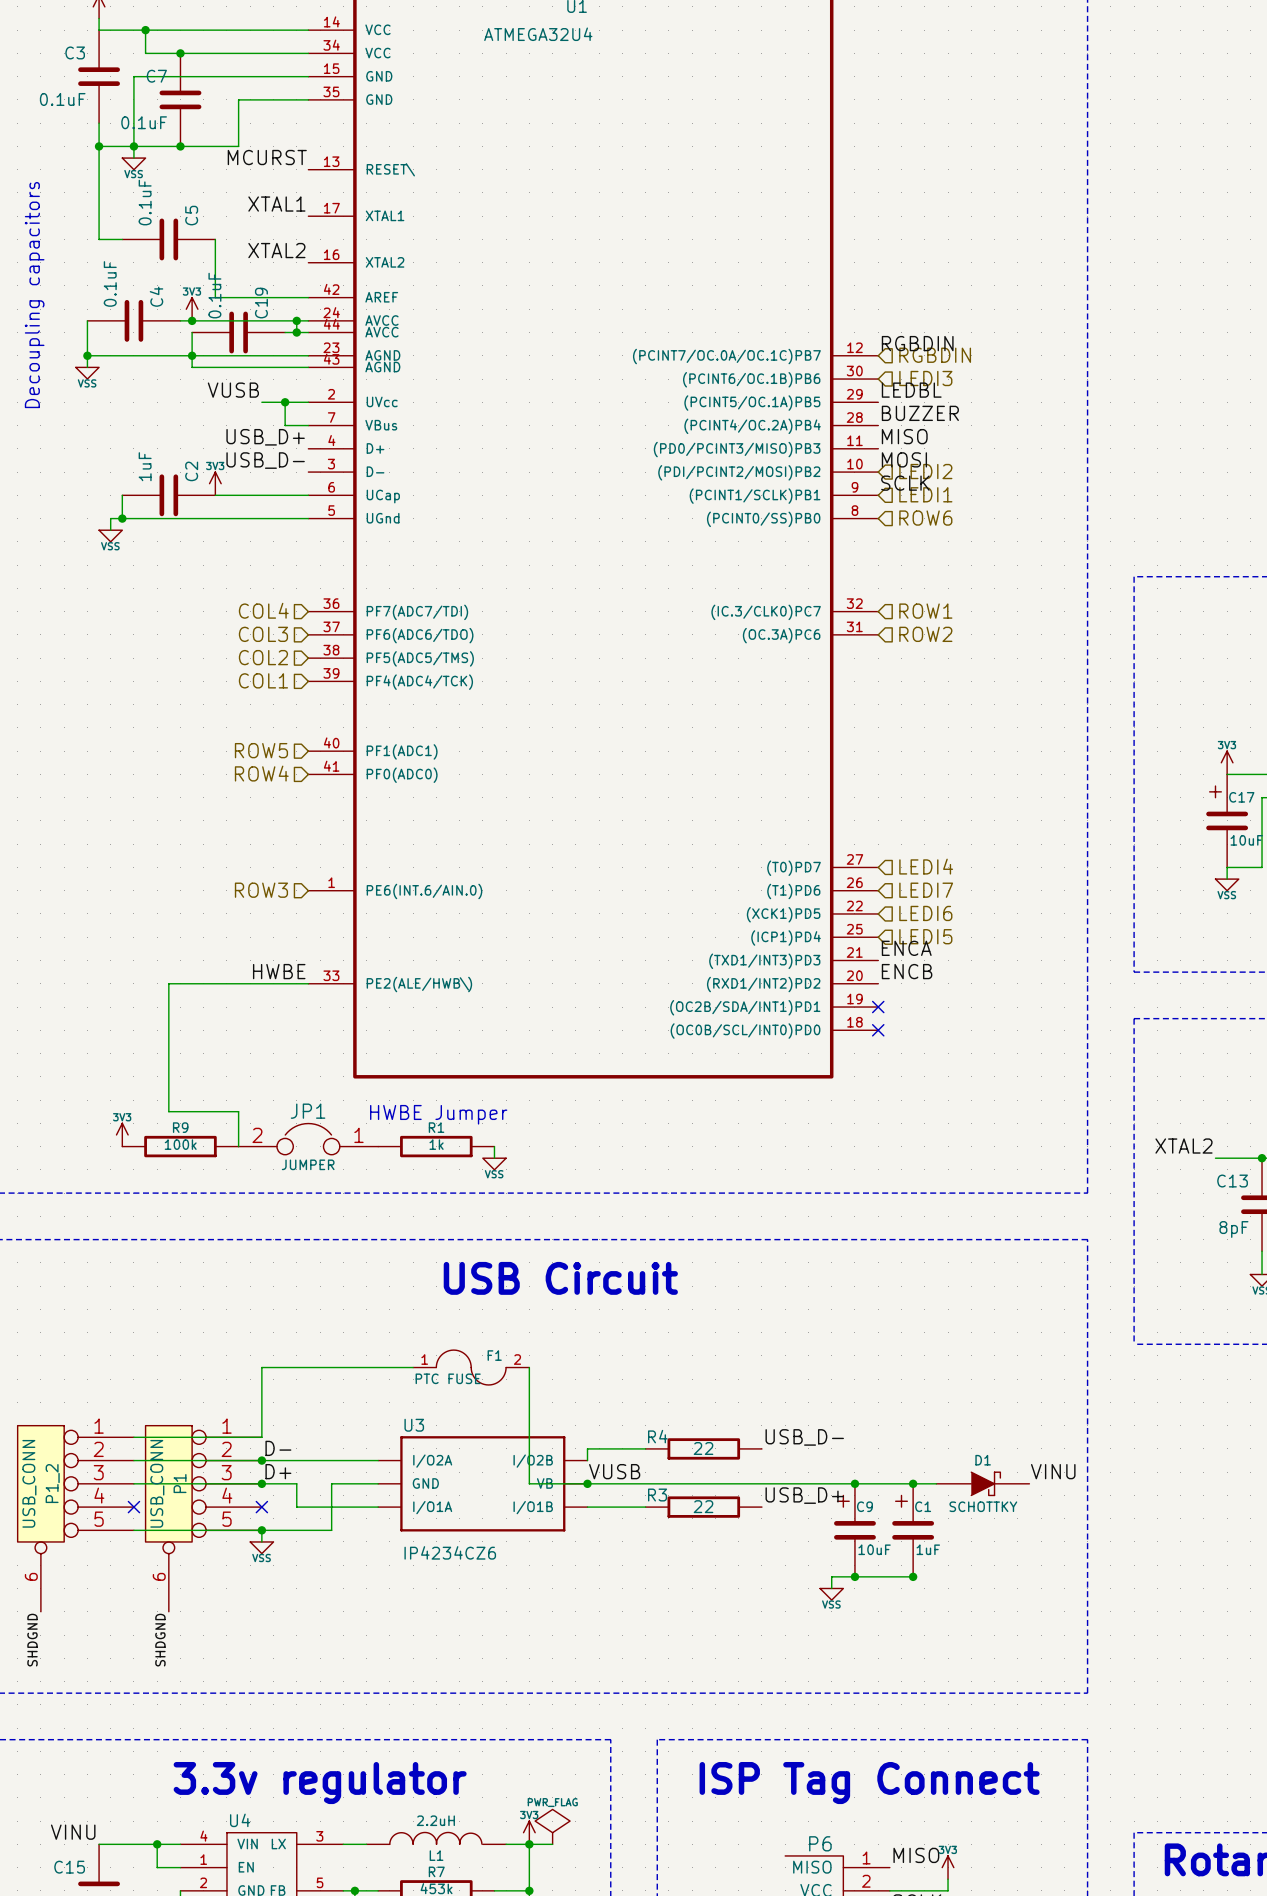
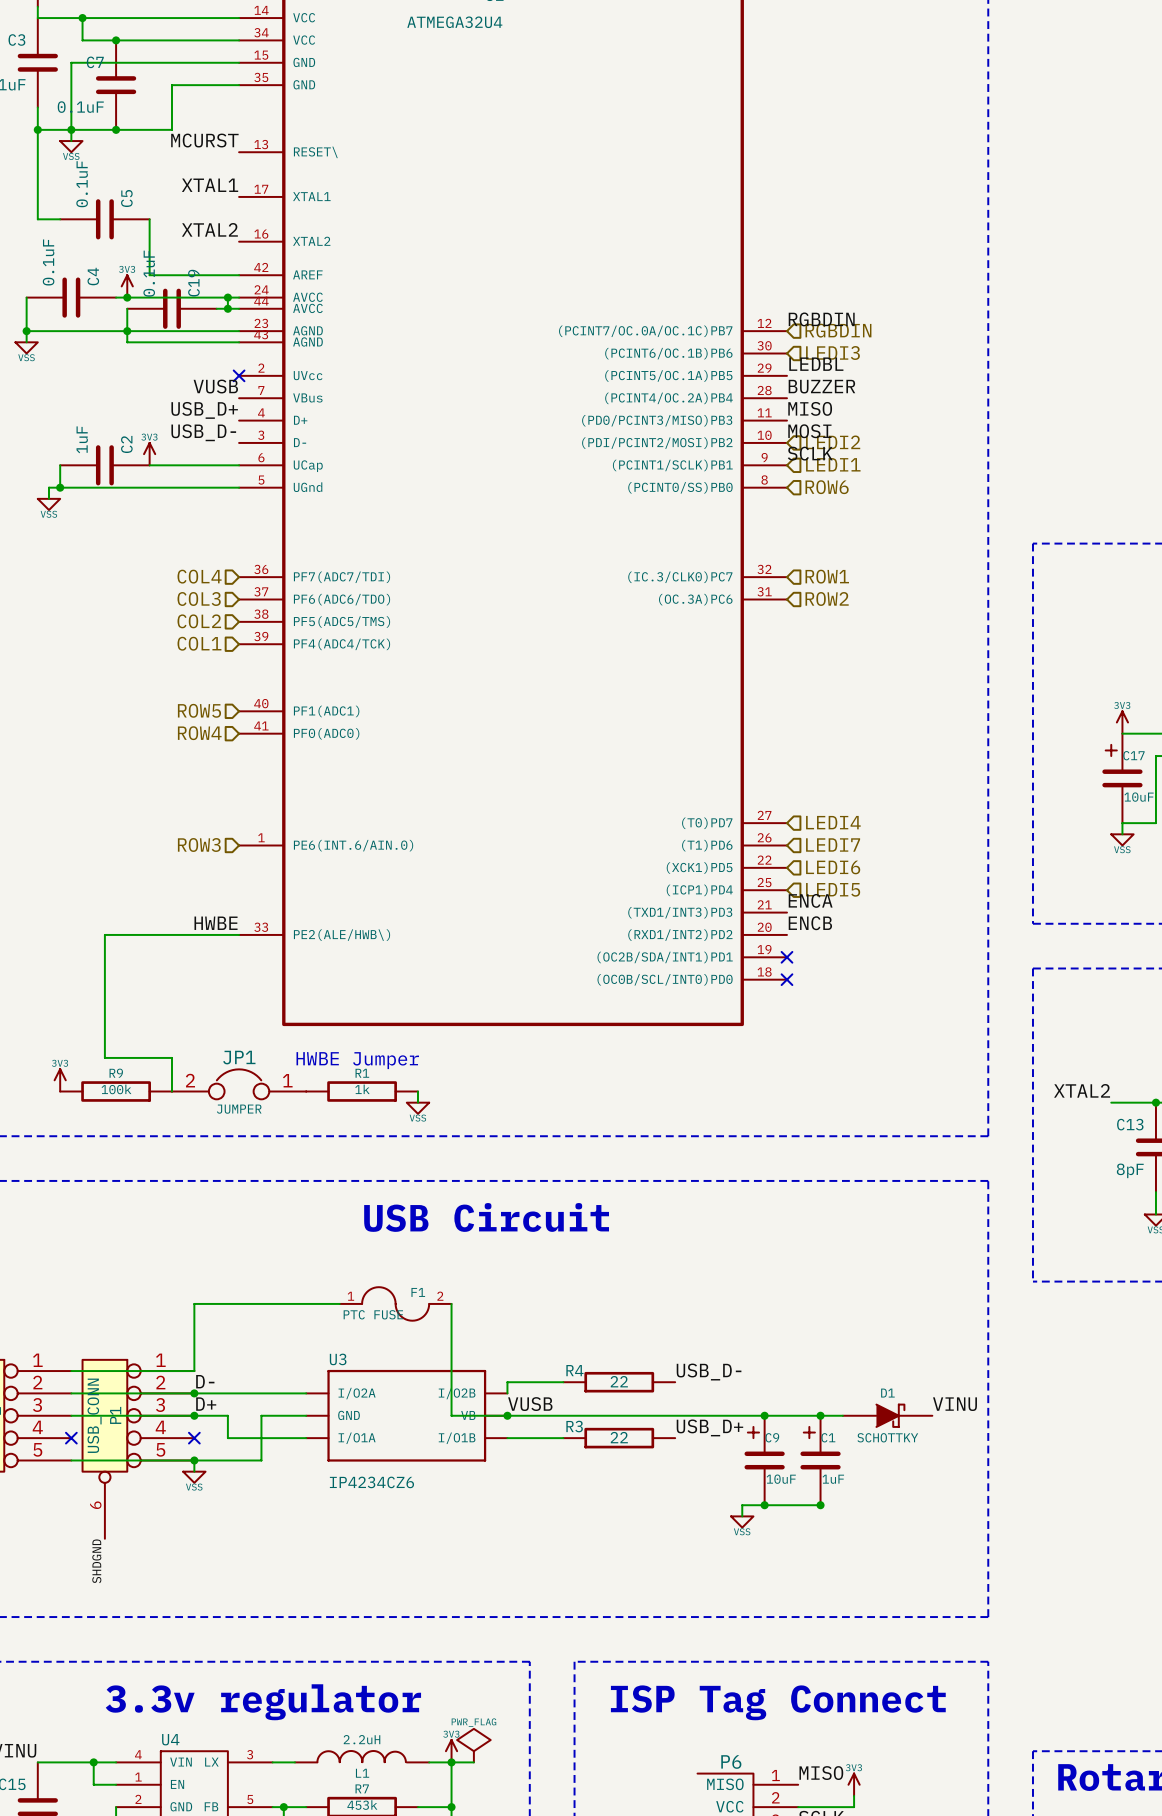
label position: VUSB (233, 390) -> VUSB (215, 386)
wire: (261, 402) (308, 402) -> none
wire: (285, 402) (285, 425) (308, 425) -> none
junction: (285, 402) -> none
no-connect mark: none -> (239, 375)

